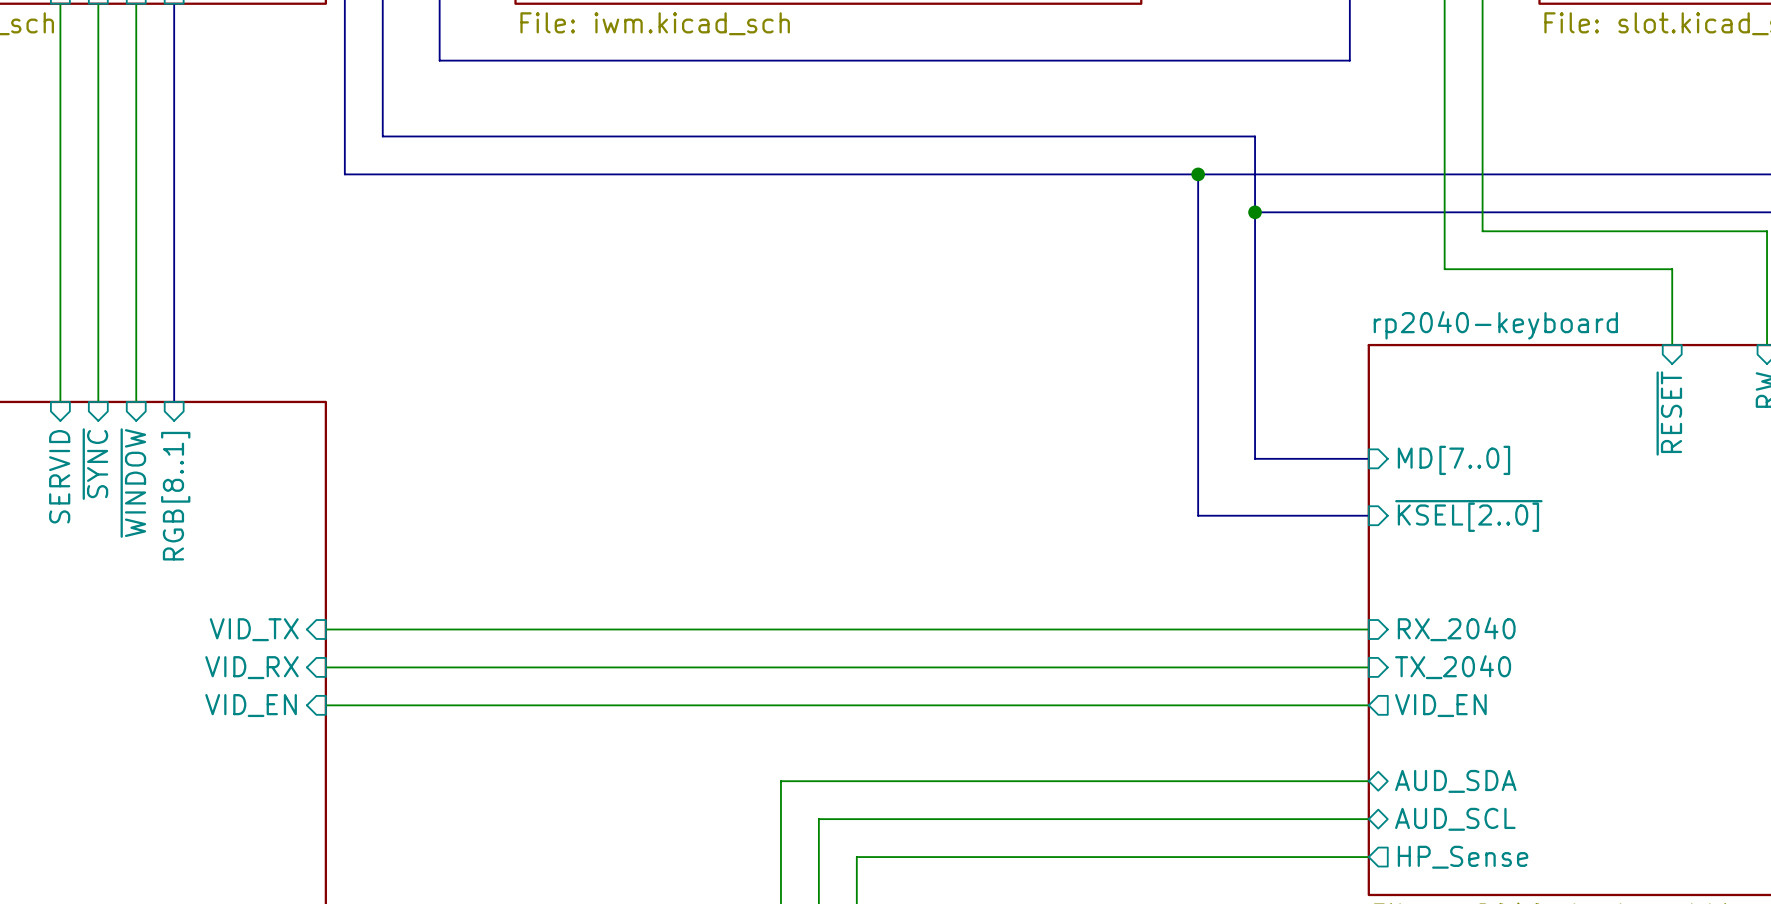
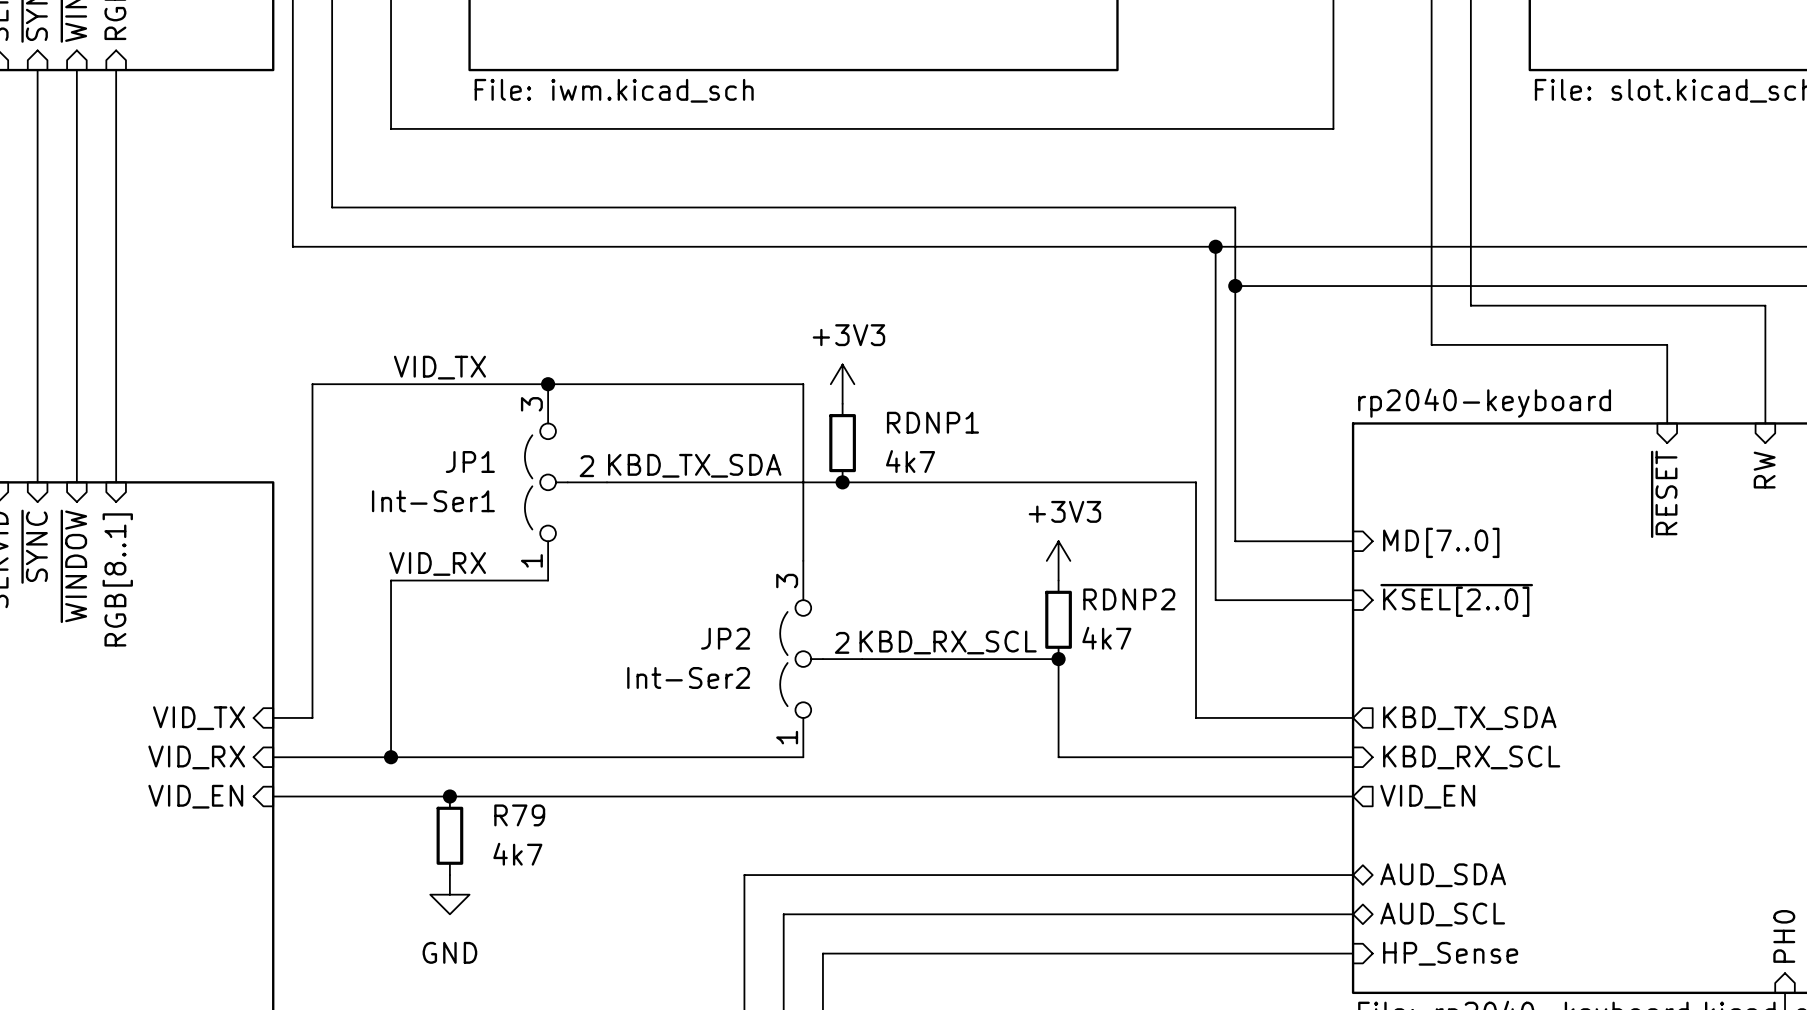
bus: (1198, 174) (1198, 515) (1236, 515) -> (1215, 246) (1215, 600)
junction position: (1198, 174) -> (1215, 246)
label: none -> VID_TX (439, 367)
junction: none -> (548, 384)
power symbol: none -> +3V3 (842, 384)
RDNP1: none -> 4k7 (842, 443)
label: none -> KBD_TX_SDA (694, 465)
JP1: none -> Int-Ser1 (565, 482)
junction: none -> (842, 482)
wire: none -> (803, 560) (803, 384) (312, 384) (312, 717)
power symbol: none -> +3V3 (1058, 560)
label: none -> VID_RX (437, 563)
wire: none -> (548, 580) (391, 580) (391, 757)
RDNP2: none -> 4k7 (1058, 619)
label: none -> KBD_RX_SCL (948, 642)
JP2: none -> Int-Ser2 (821, 659)
junction: none -> (1058, 659)
wire: (363, 629) (1217, 629) -> (606, 482) (1196, 482) (1196, 717)
sheet pin shape: input (1456, 629) -> output (1469, 718)
sheet pin: RX_2040 (1456, 629) -> KBD_TX_SDA (1469, 718)
junction: none -> (391, 757)
wire: (837, 667) (1084, 667) -> (862, 659) (1058, 659) (1058, 757)
sheet pin: TX_2040 (1453, 667) -> KBD_RX_SCL (1471, 757)
junction: none -> (449, 796)
R79: none -> 4k7 (449, 835)
power symbol: none -> GND (449, 894)
sheet pin shape: output (1463, 857) -> input (1450, 953)

